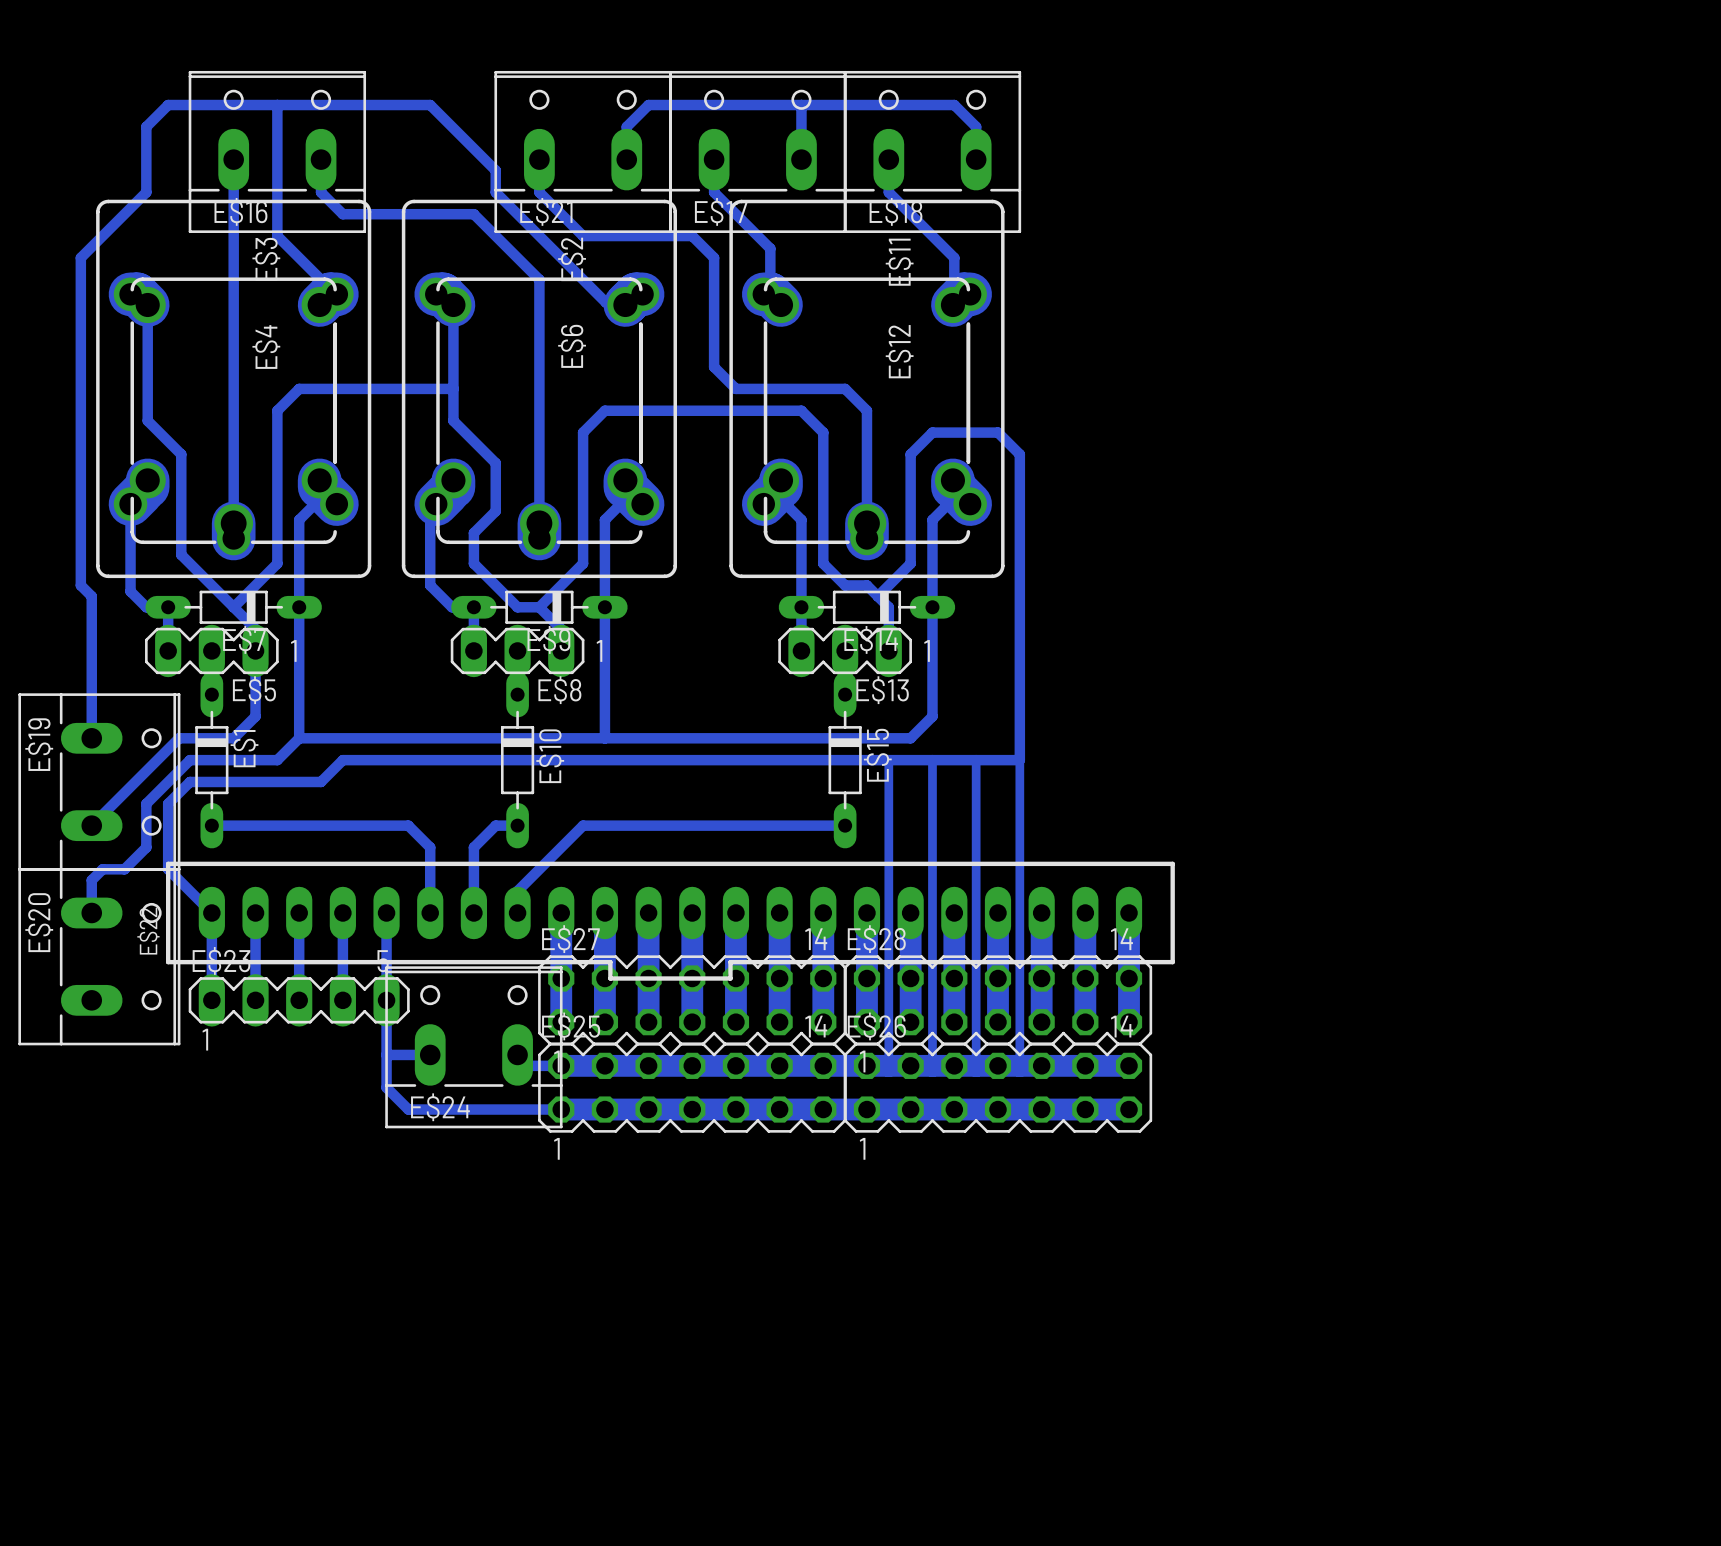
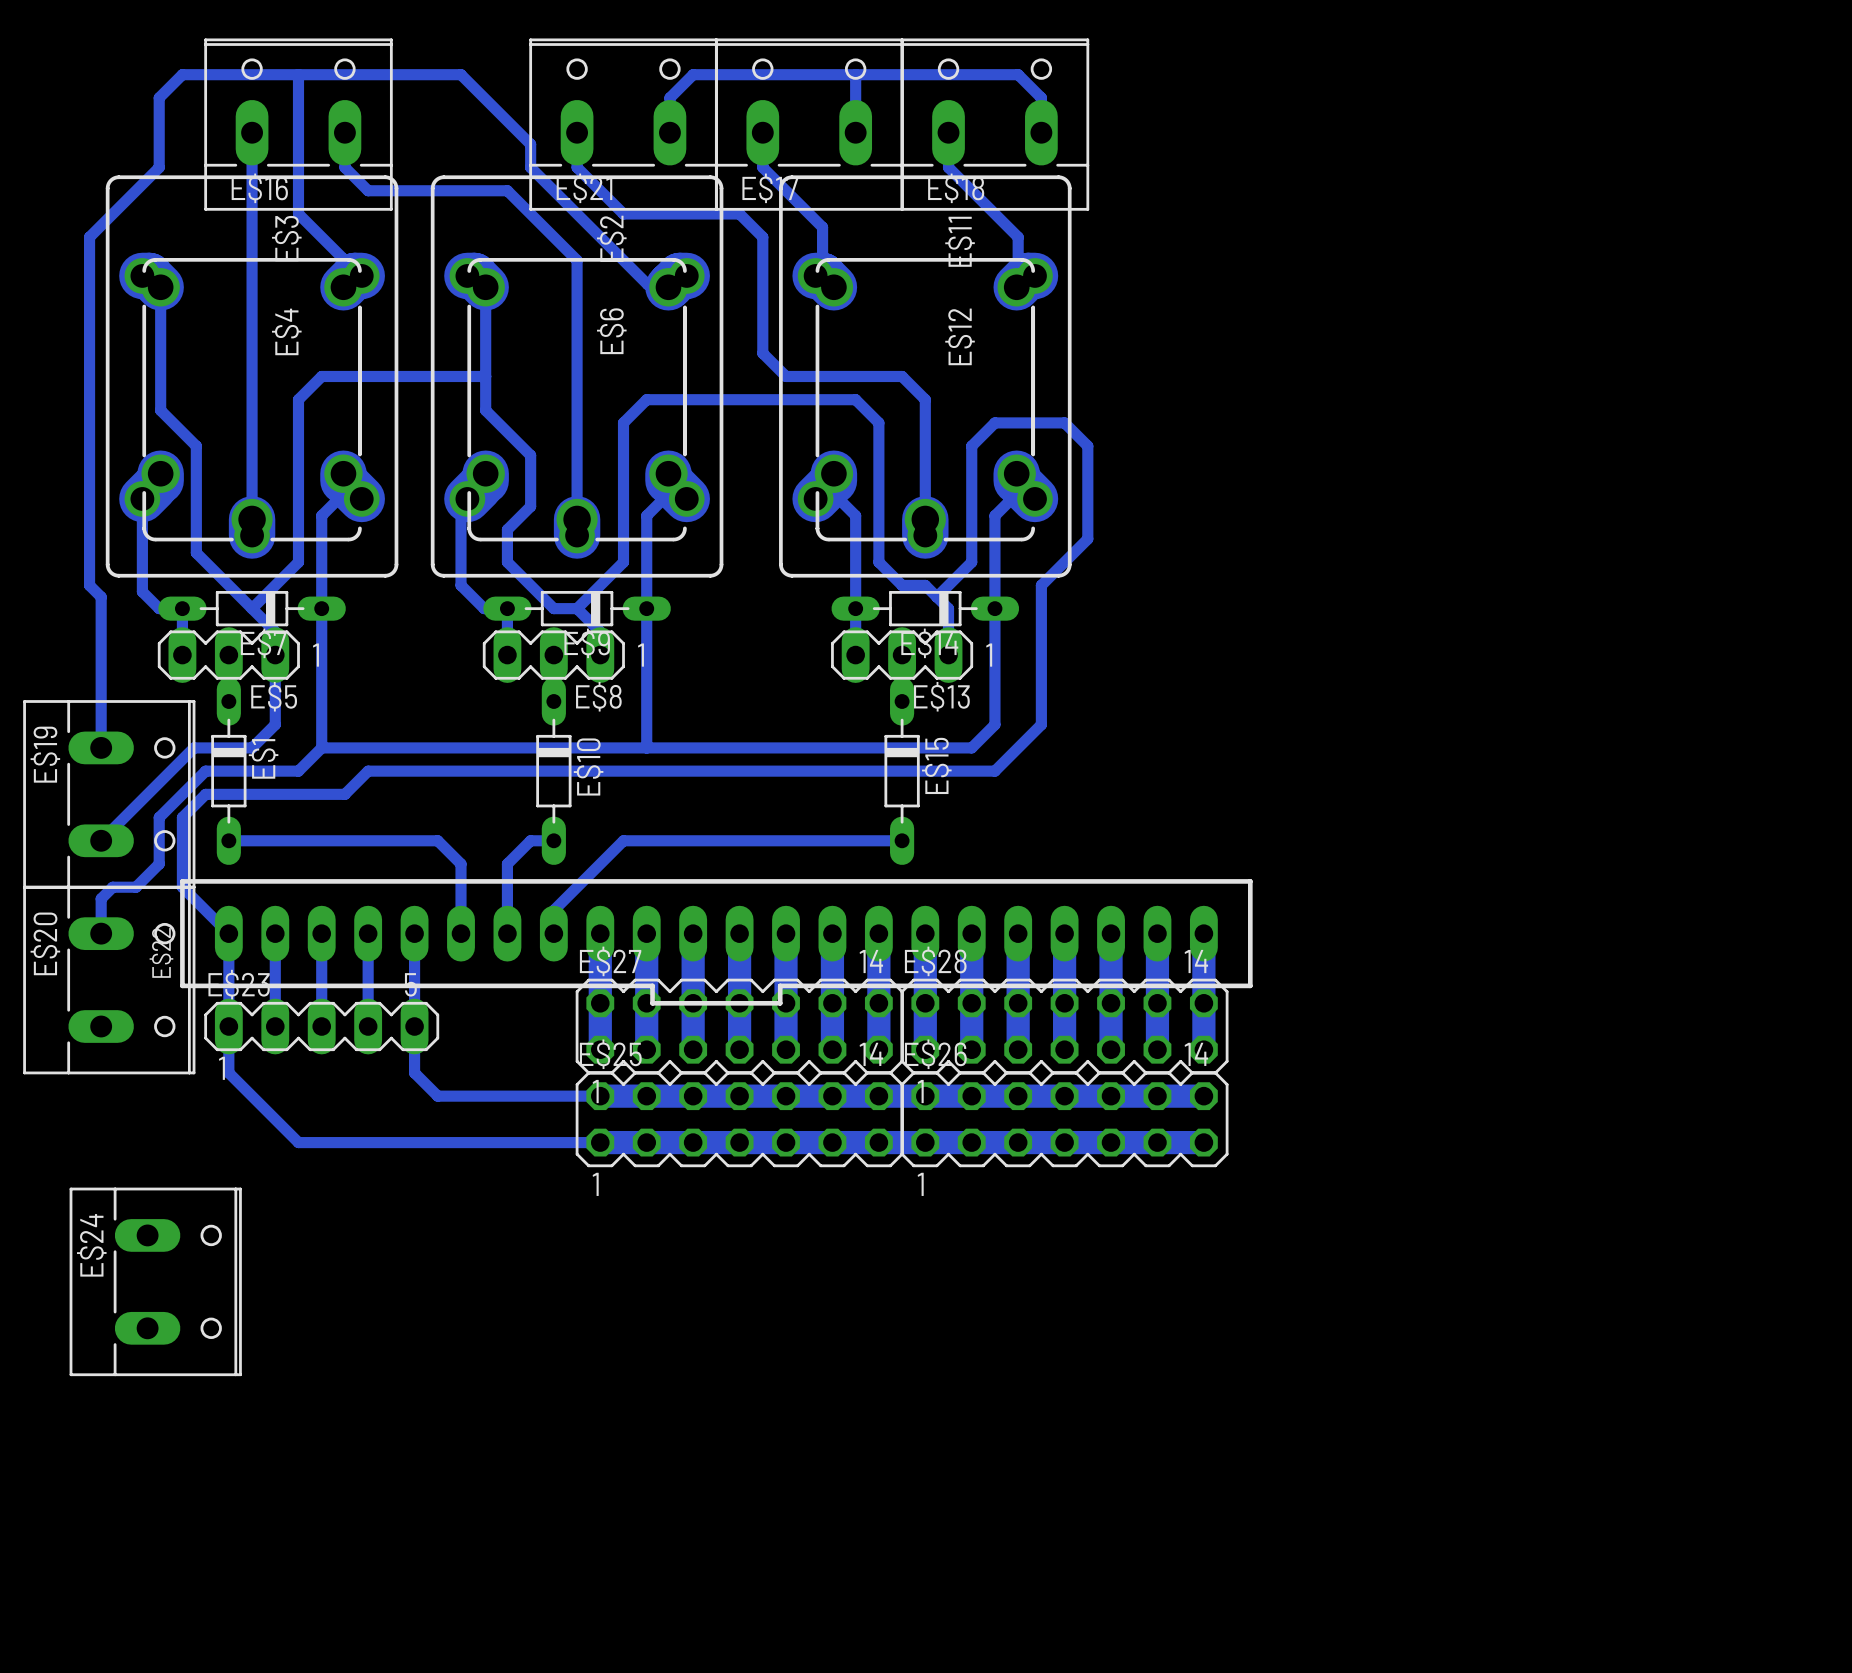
bottom track: (1019, 541) (1019, 760) -> (1087, 538) (1041, 585) (1041, 724) (994, 771)
bottom track: (888, 760) (888, 1065) -> none
bottom track: (976, 760) (976, 1065) -> none
bottom track: (1019, 760) (932, 760) (932, 1065) -> none
bottom track: (1019, 760) (1019, 1065) -> none
bottom track: none -> (228, 1026) (228, 1072) (298, 1142) (437, 1142)
bottom track: (386, 1044) (386, 1087) (408, 1109) -> (414, 1072) (437, 1096) (553, 1096)
E$24 rotation: 0° (473, 1047) -> 90° clockwise (155, 1281)
E$24 position: (473, 1047) -> (155, 1281)
bottom track: (386, 1054) (430, 1054) -> none

